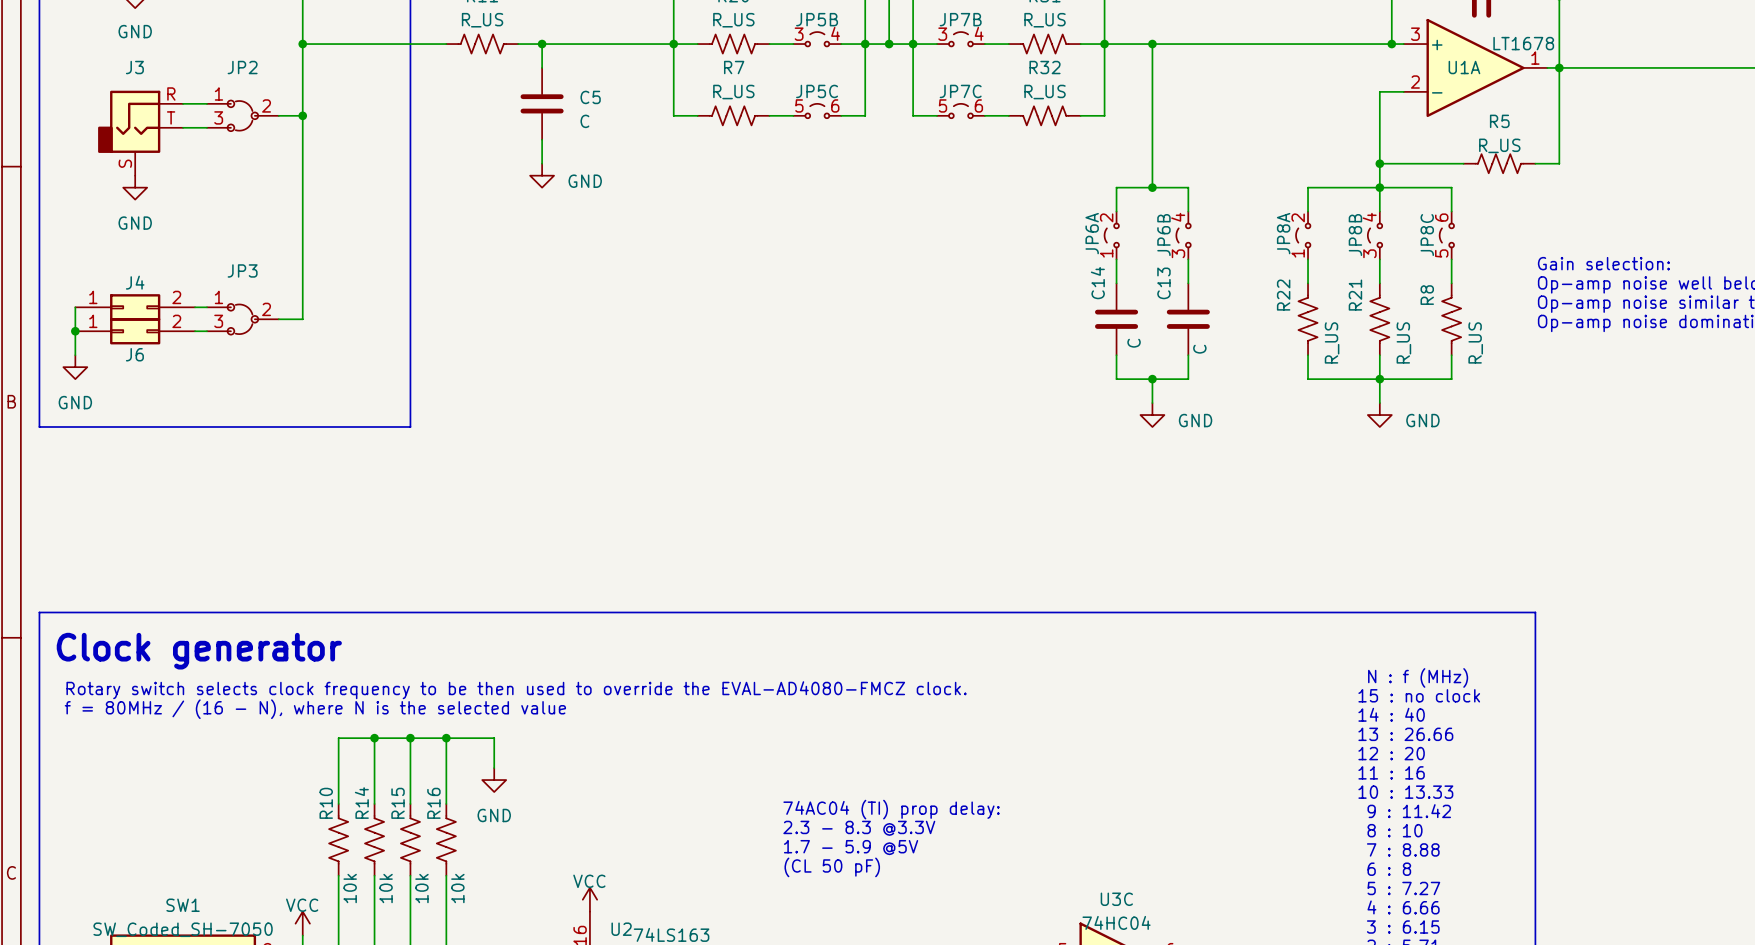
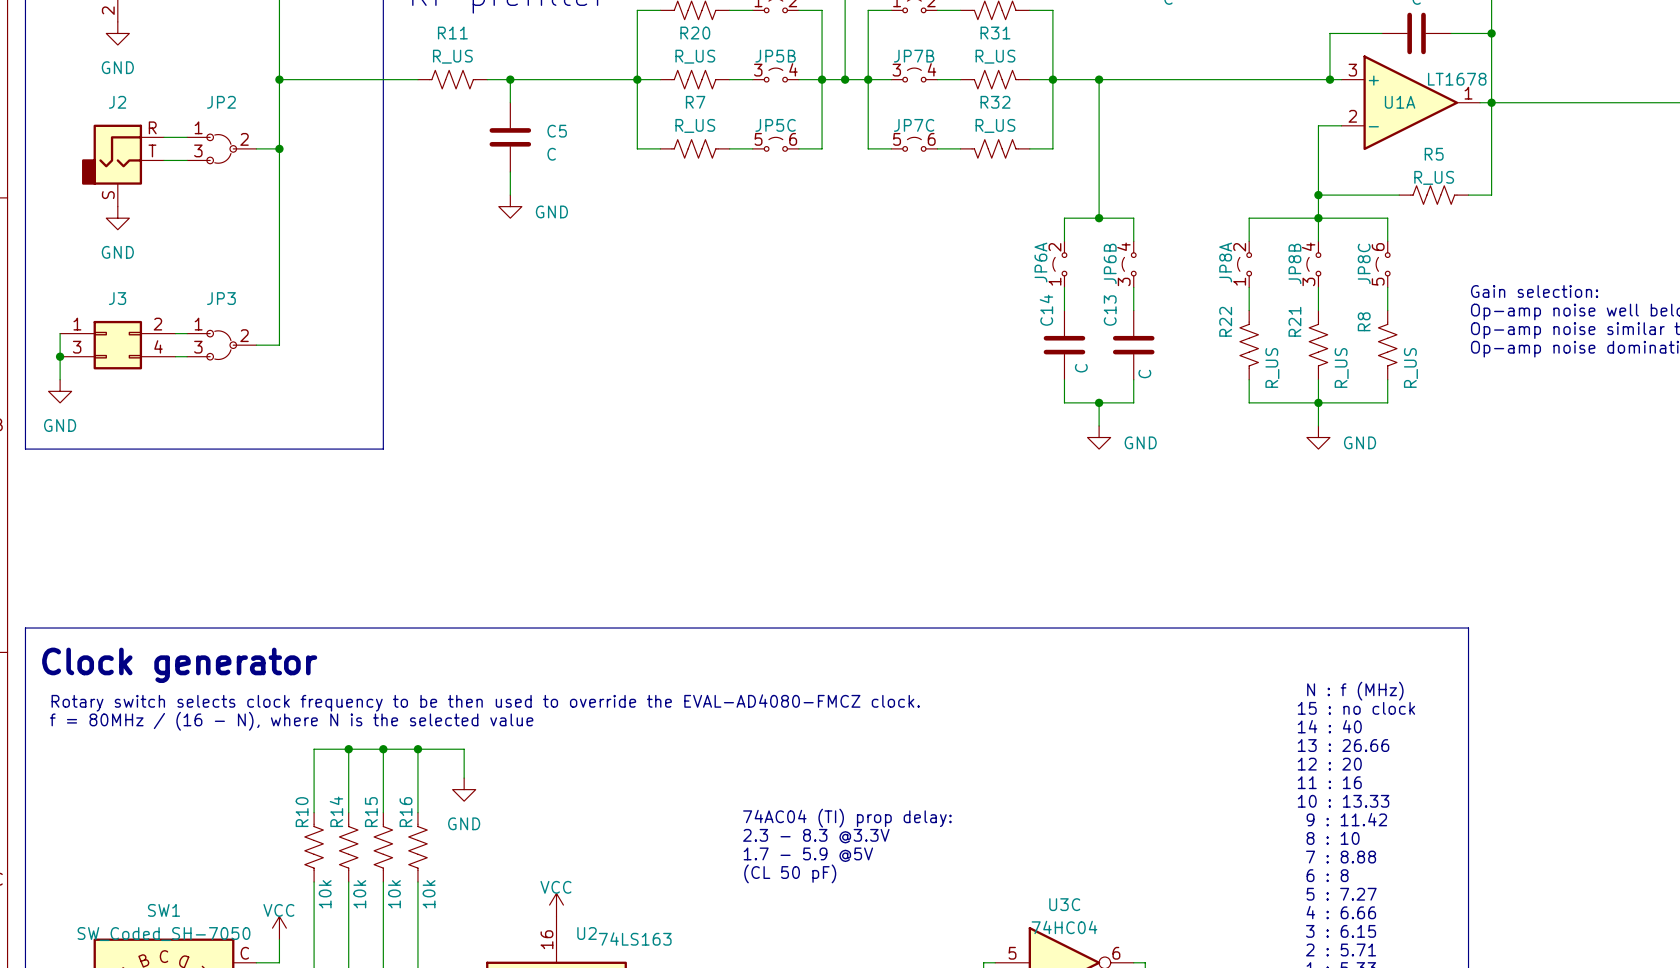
J3 name: J3 (134, 67) -> J2 (117, 102)
J4: (135, 307) -> none
J3: none -> (117, 345)
J6: (135, 331) -> none

